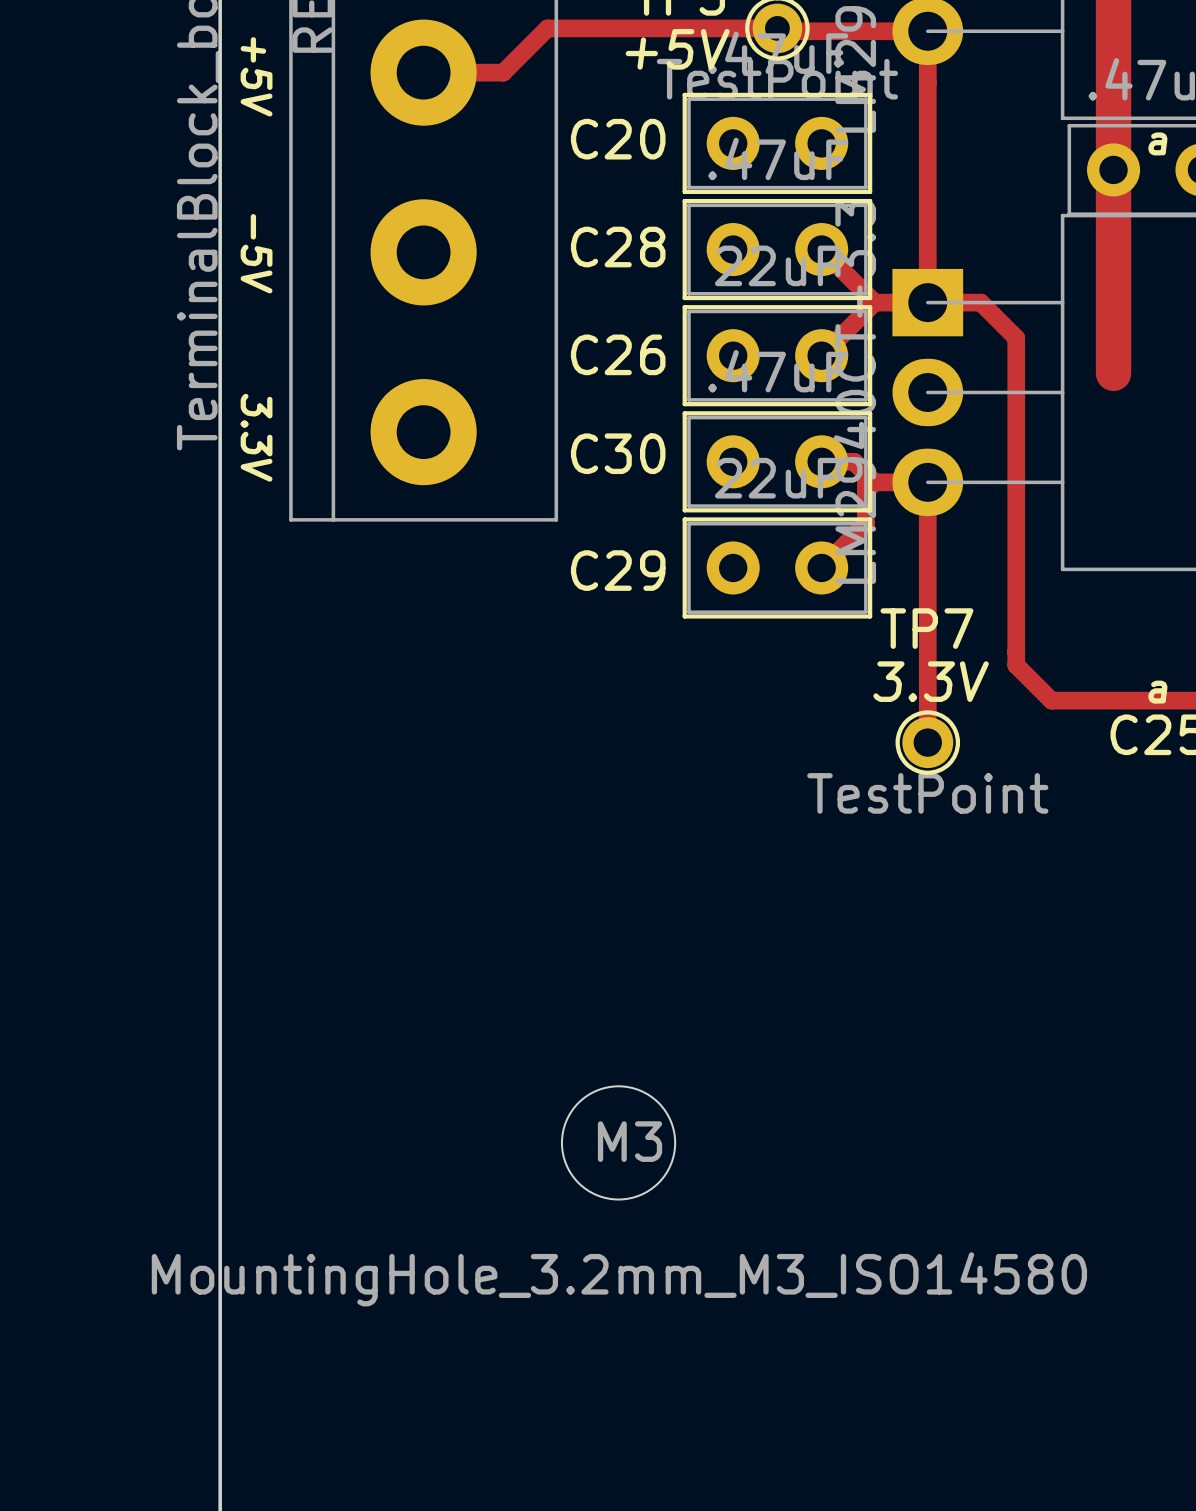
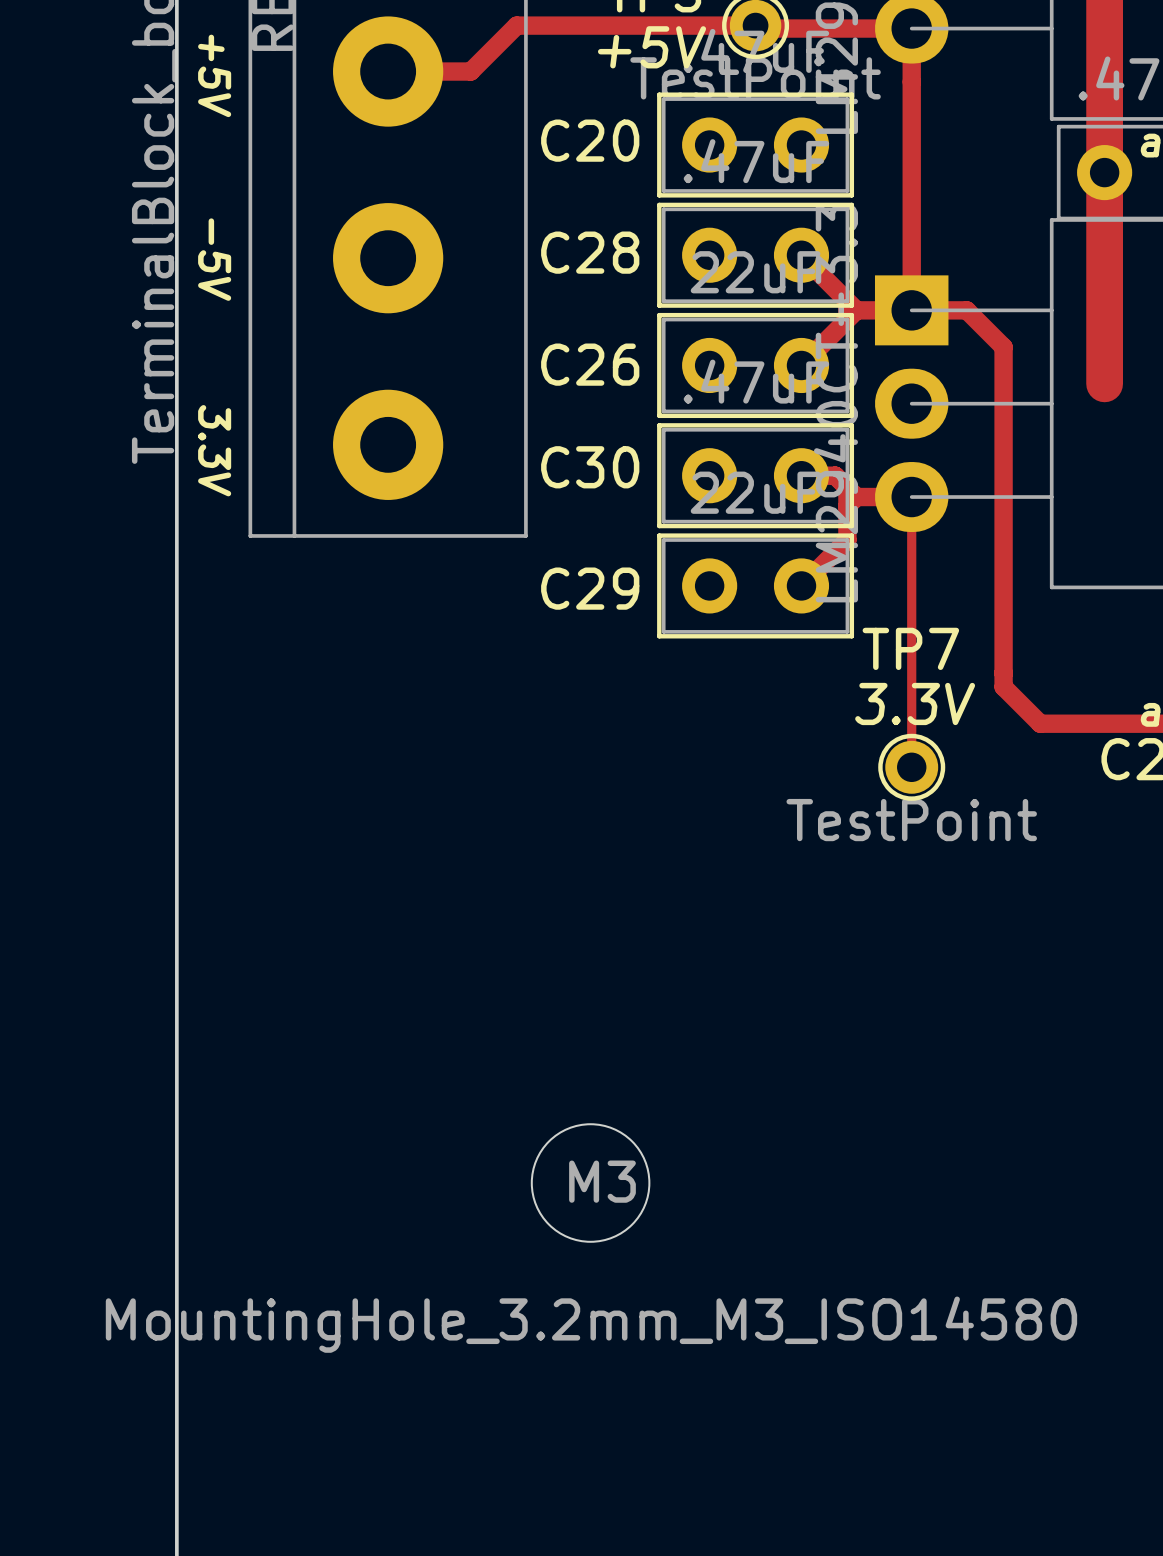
track width: thick (927, 482) (927, 742) -> thin (911, 497) (911, 767)

